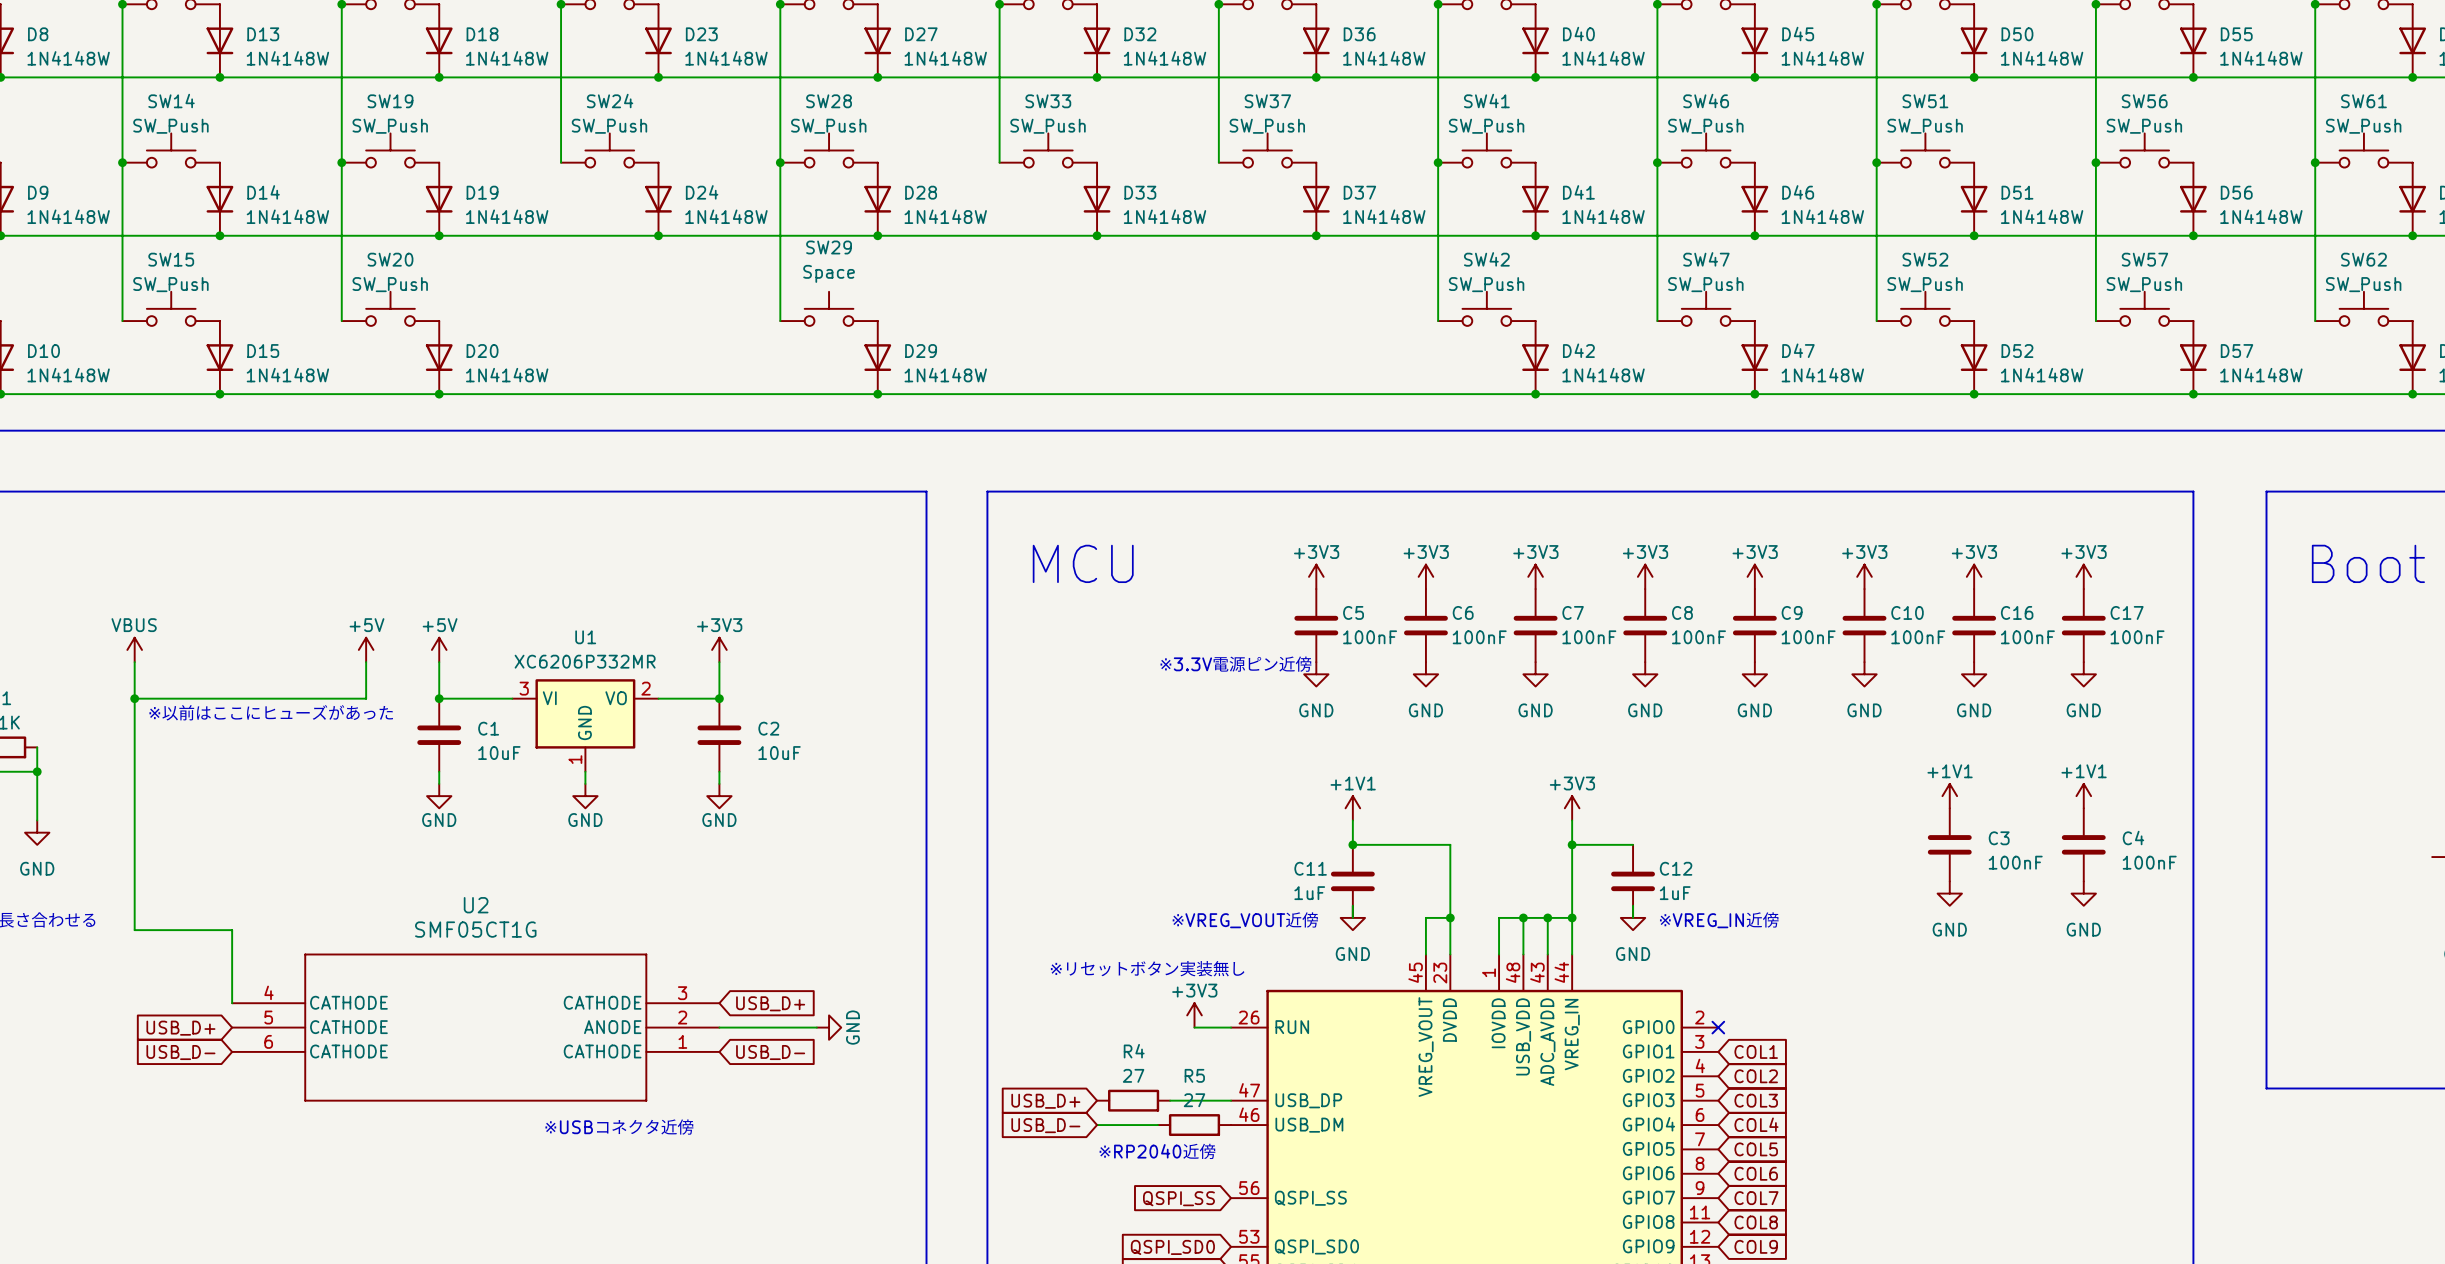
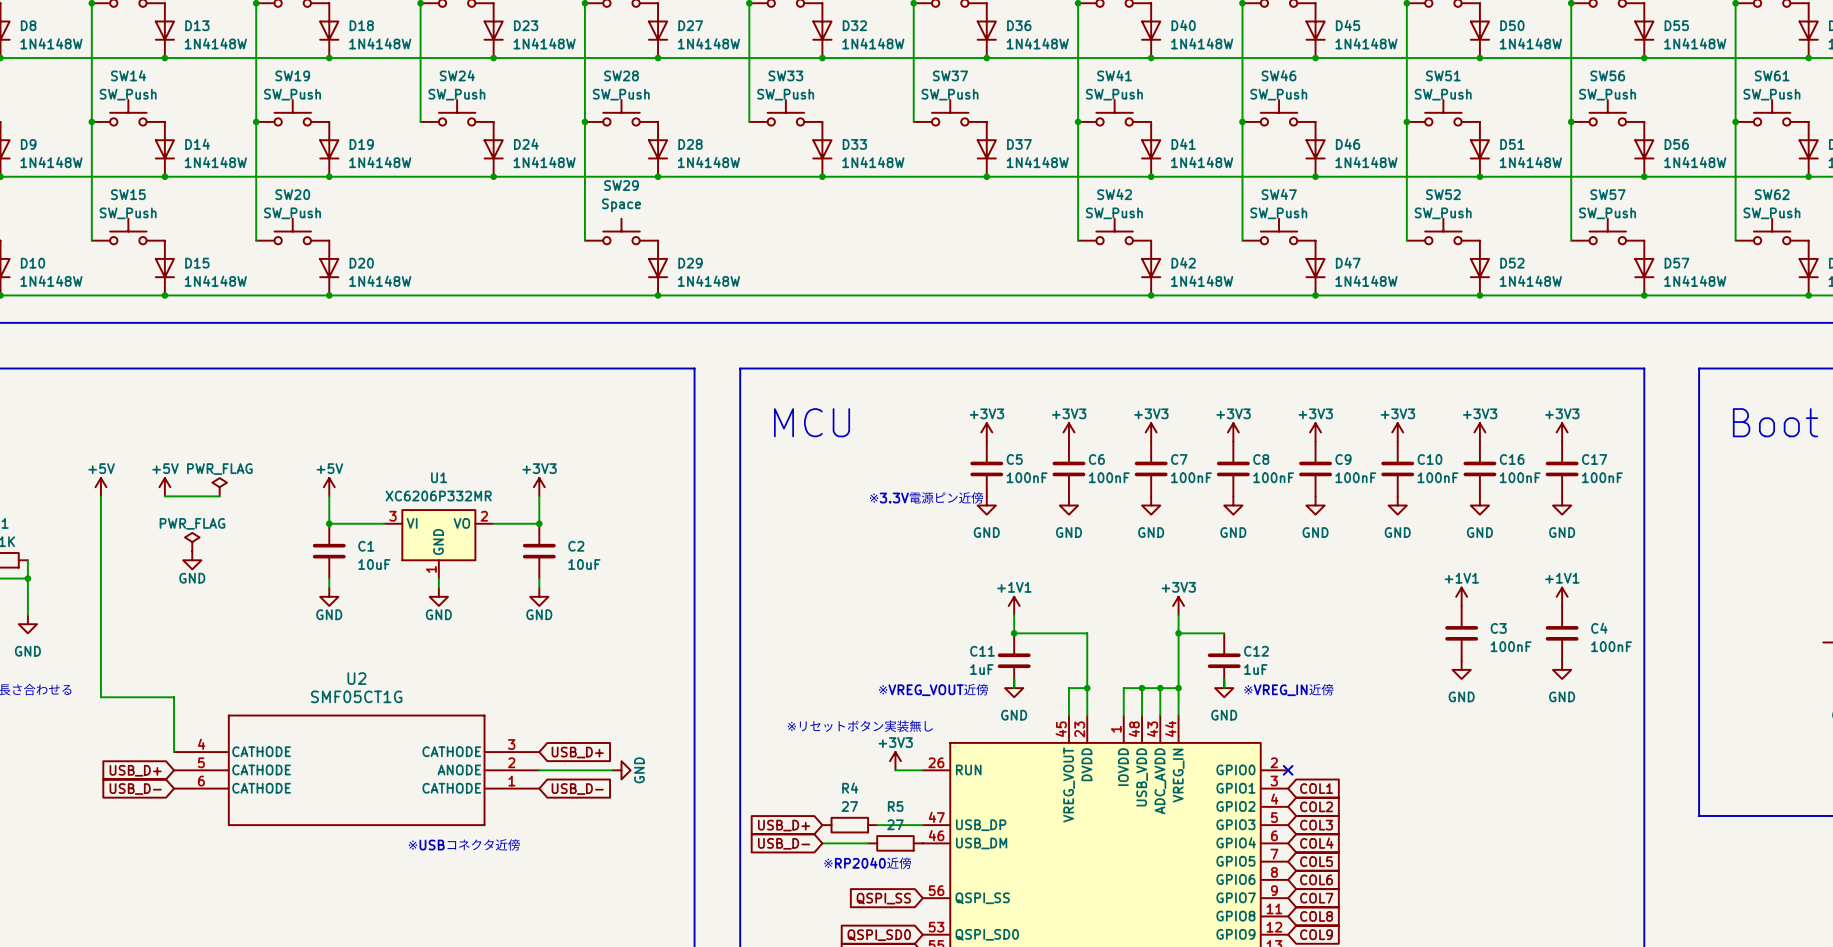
power symbol: VBUS (134, 649) -> +5V (100, 487)
power symbol: none -> PWR_FLAG (219, 487)
power symbol position: +5V (366, 649) -> +5V (164, 487)
wire: none -> (164, 496) (219, 496)
wire: (366, 662) (366, 698) (134, 698) -> none
junction: (134, 698) -> none
text: ※以前はここにヒューズがあった (271, 712) -> none
power symbol: none -> PWR_FLAG (192, 542)
power symbol: none -> GND (192, 560)

